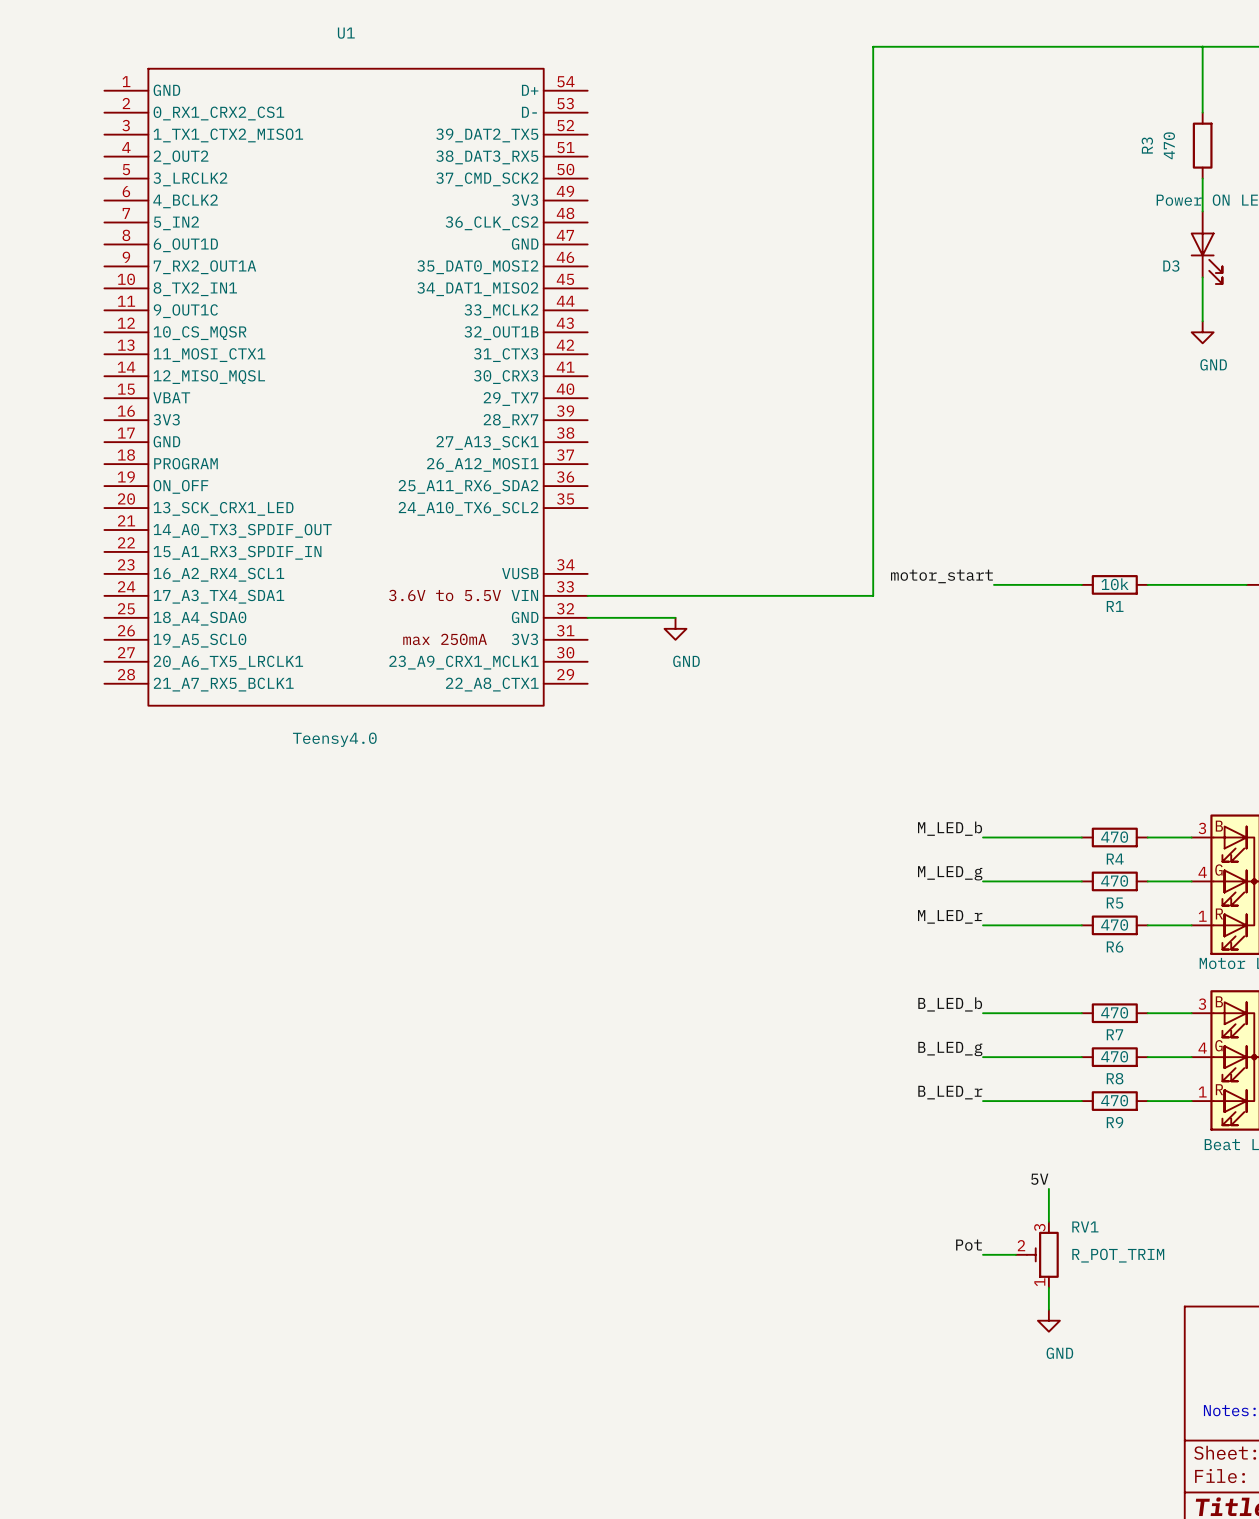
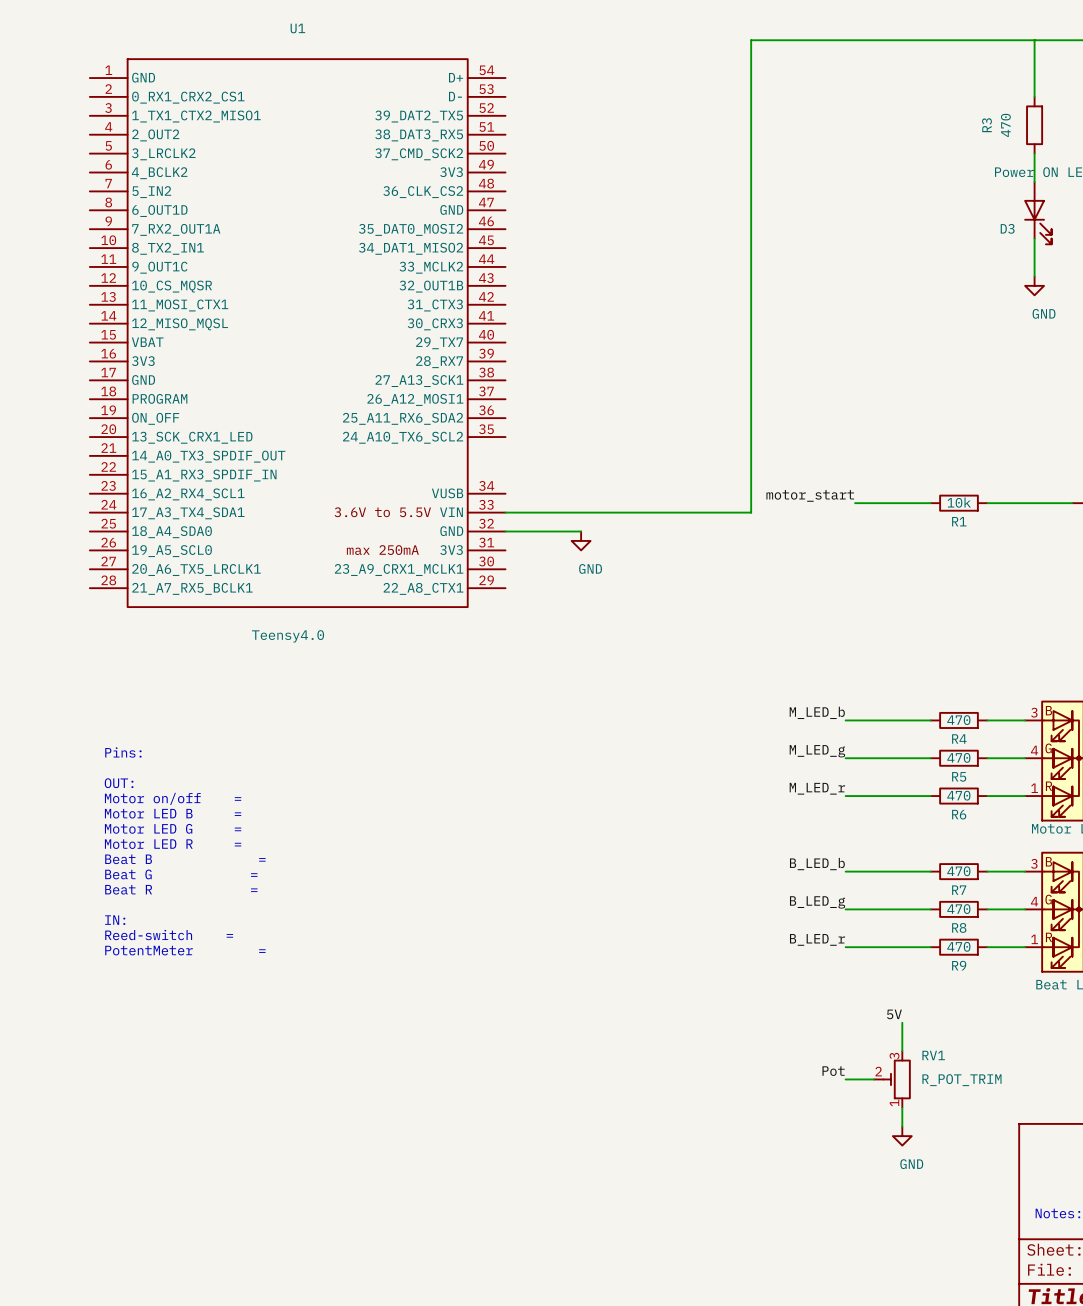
text: none -> Pins: (123, 752)
text: none -> OUT: (119, 783)
text: none -> Motor on/off = (173, 798)
text: none -> Motor LED B = (173, 813)
text: none -> Motor LED G = (173, 828)
text: none -> Motor LED R = (173, 844)
text: none -> Beat B = (185, 859)
text: none -> Beat G = (181, 874)
text: none -> Beat R = (181, 889)
text: none -> IN: (115, 920)
text: none -> Reed-switch = (169, 935)
text: none -> PotentMeter = (185, 950)

